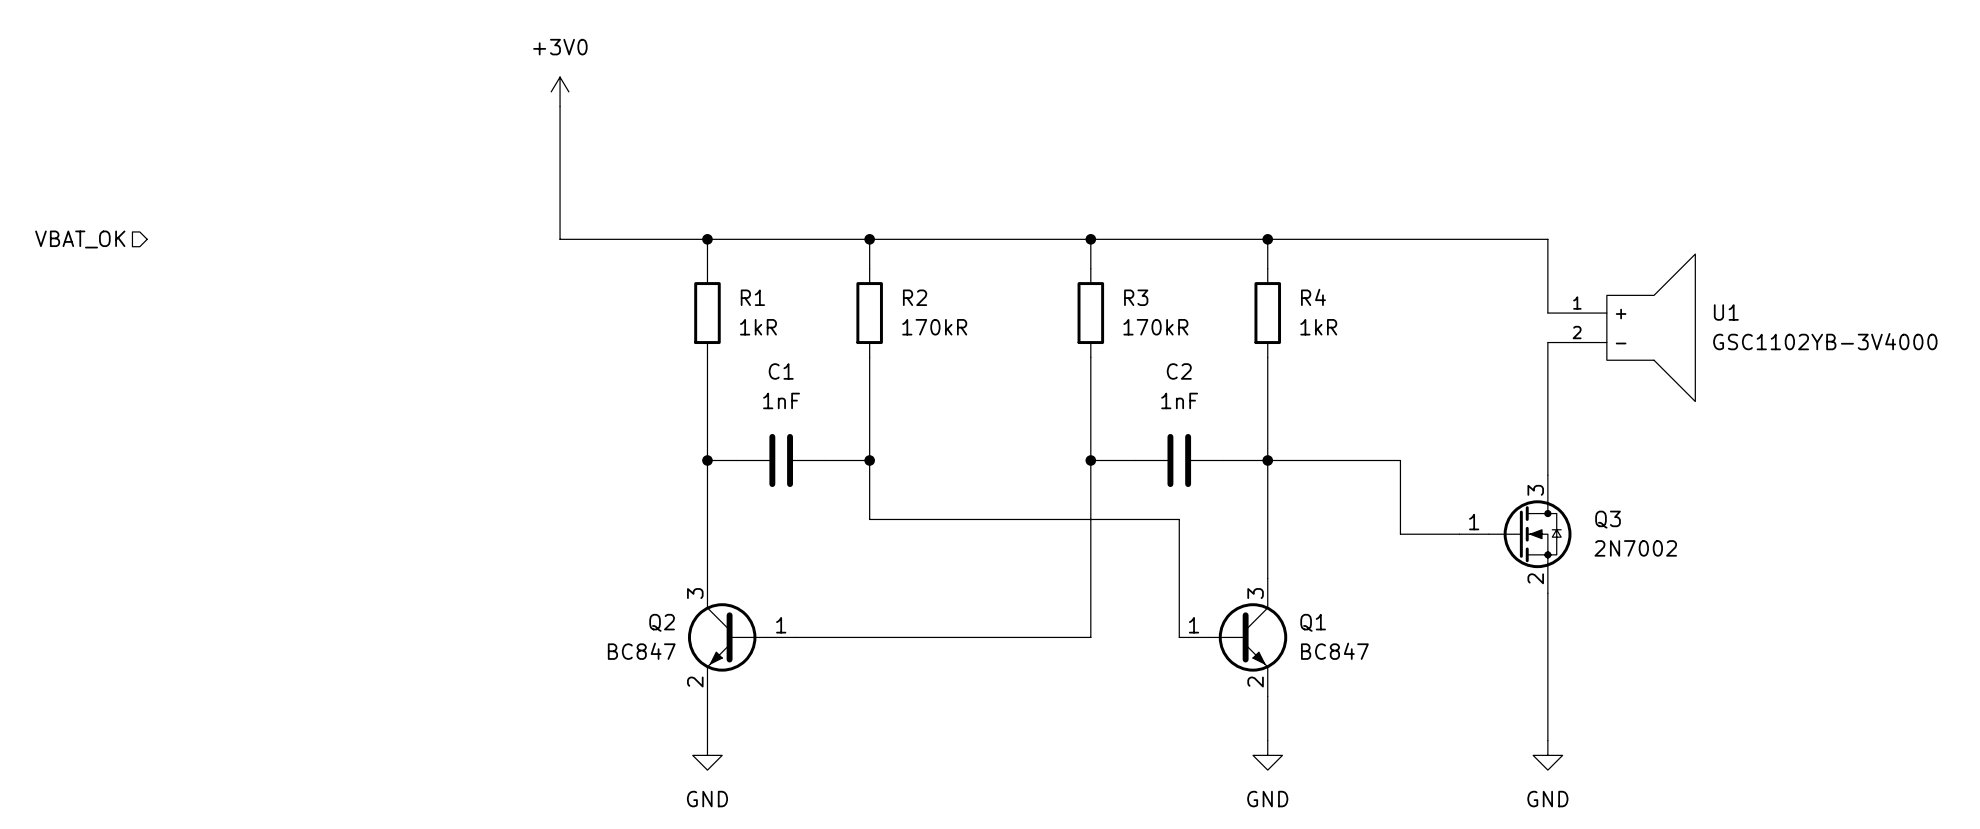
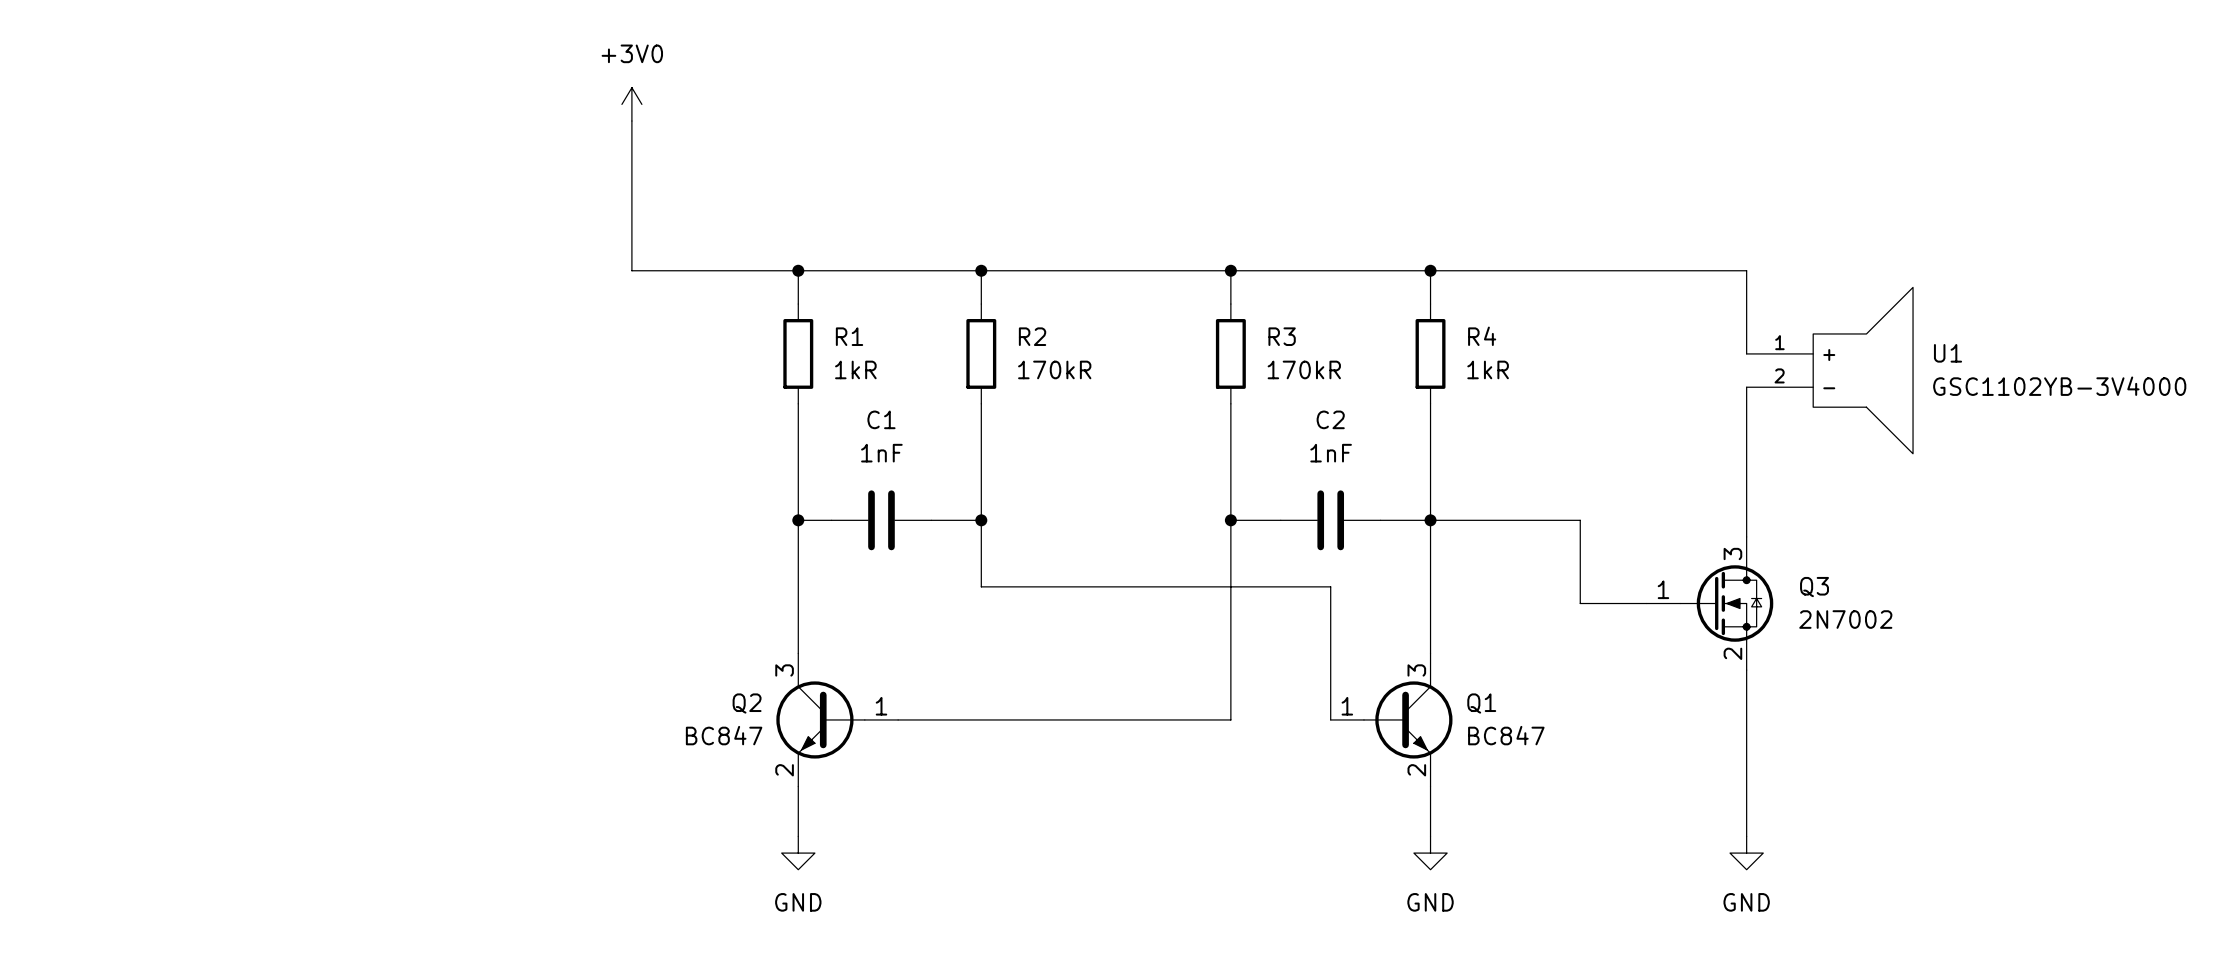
hierarchical label: VBAT_OK (80, 239) -> none

